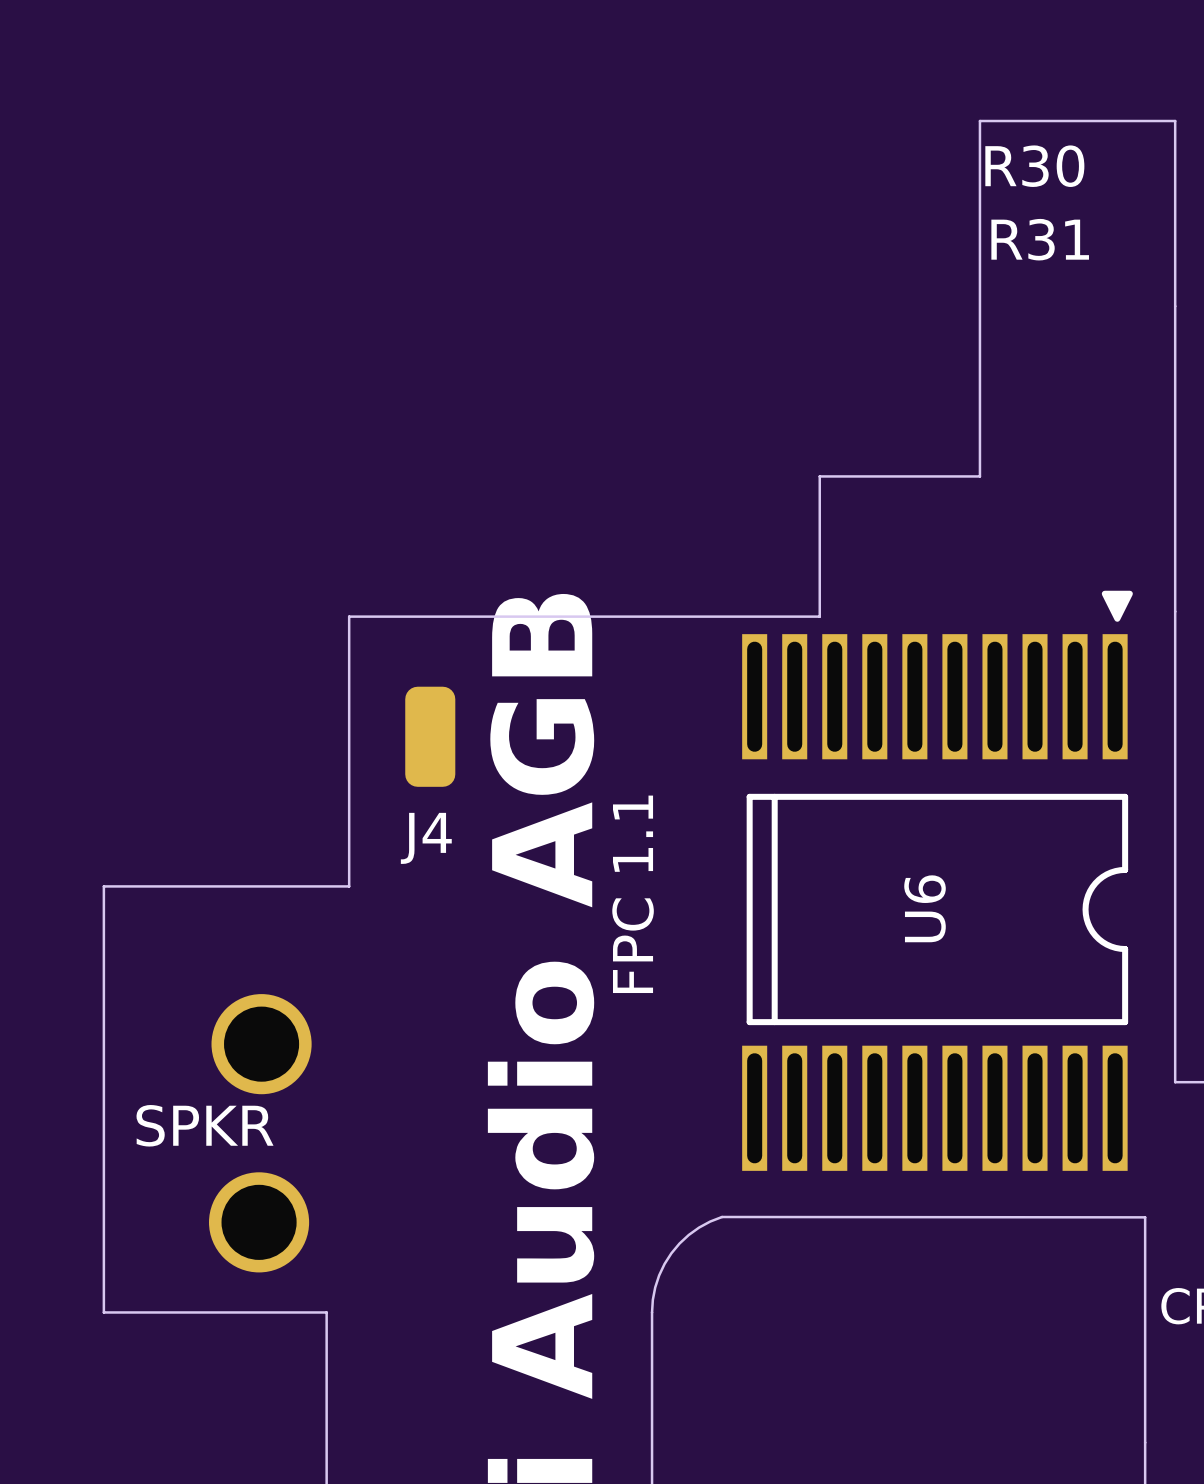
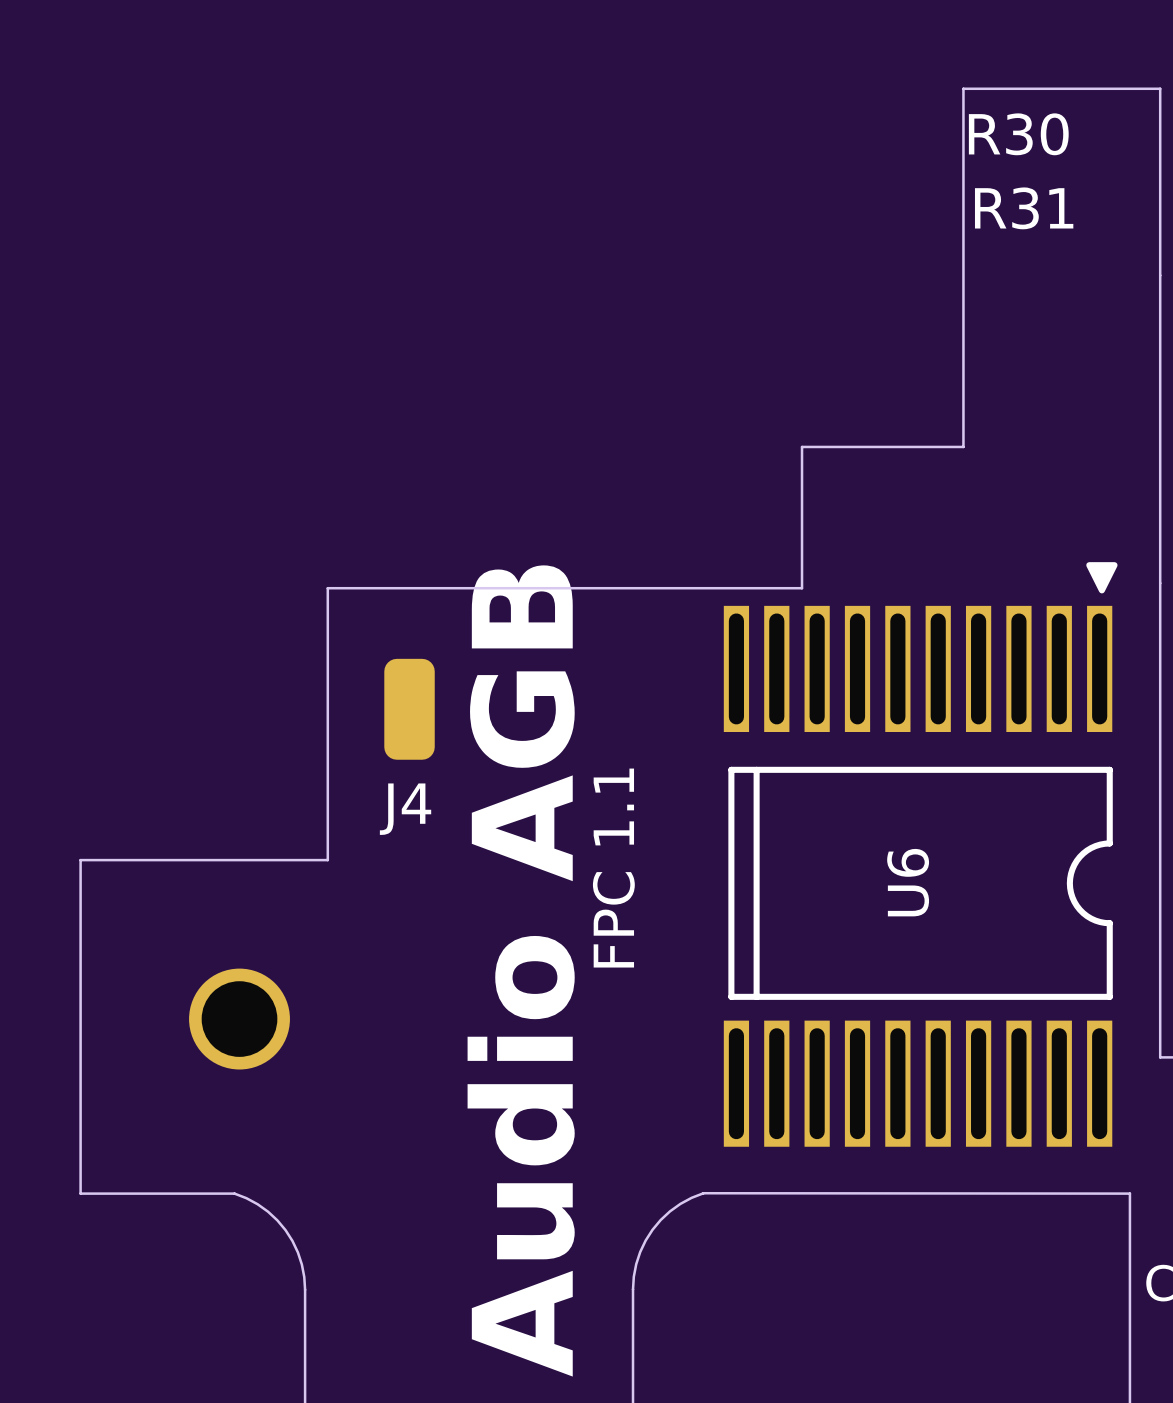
J4 name: none -> J4 (405, 809)
J4 value: J4 (426, 838) -> none
text: SPKR (205, 1125) -> none
board edge: (103, 1217) (103, 1312) (326, 1312) -> (80, 1193) (234, 1193) (246, 1198) (268, 1211) (285, 1230) (297, 1252) (301, 1264) (305, 1289)
part: (259, 1222) -> none

